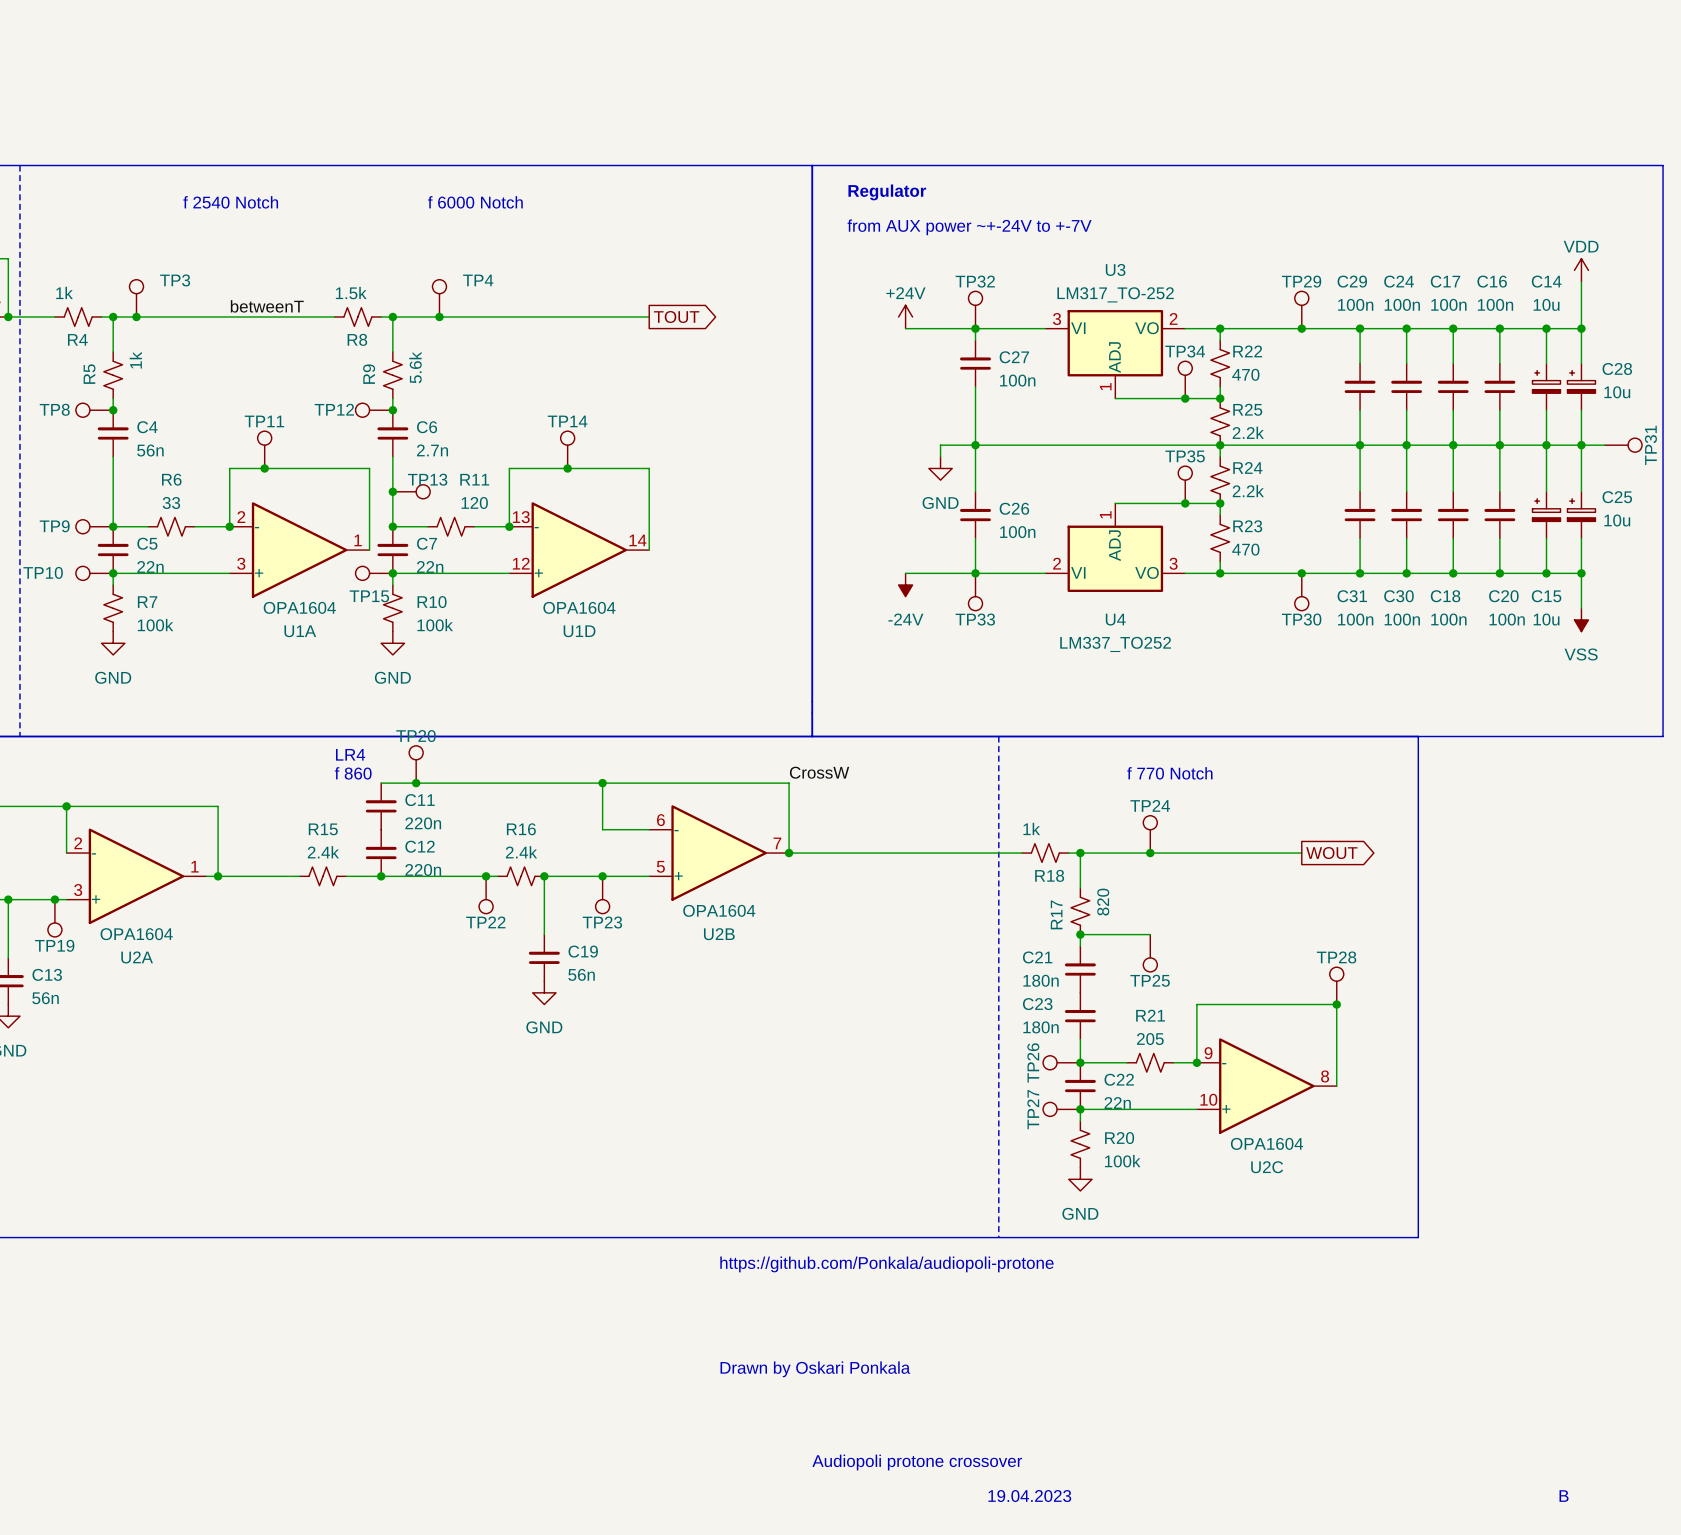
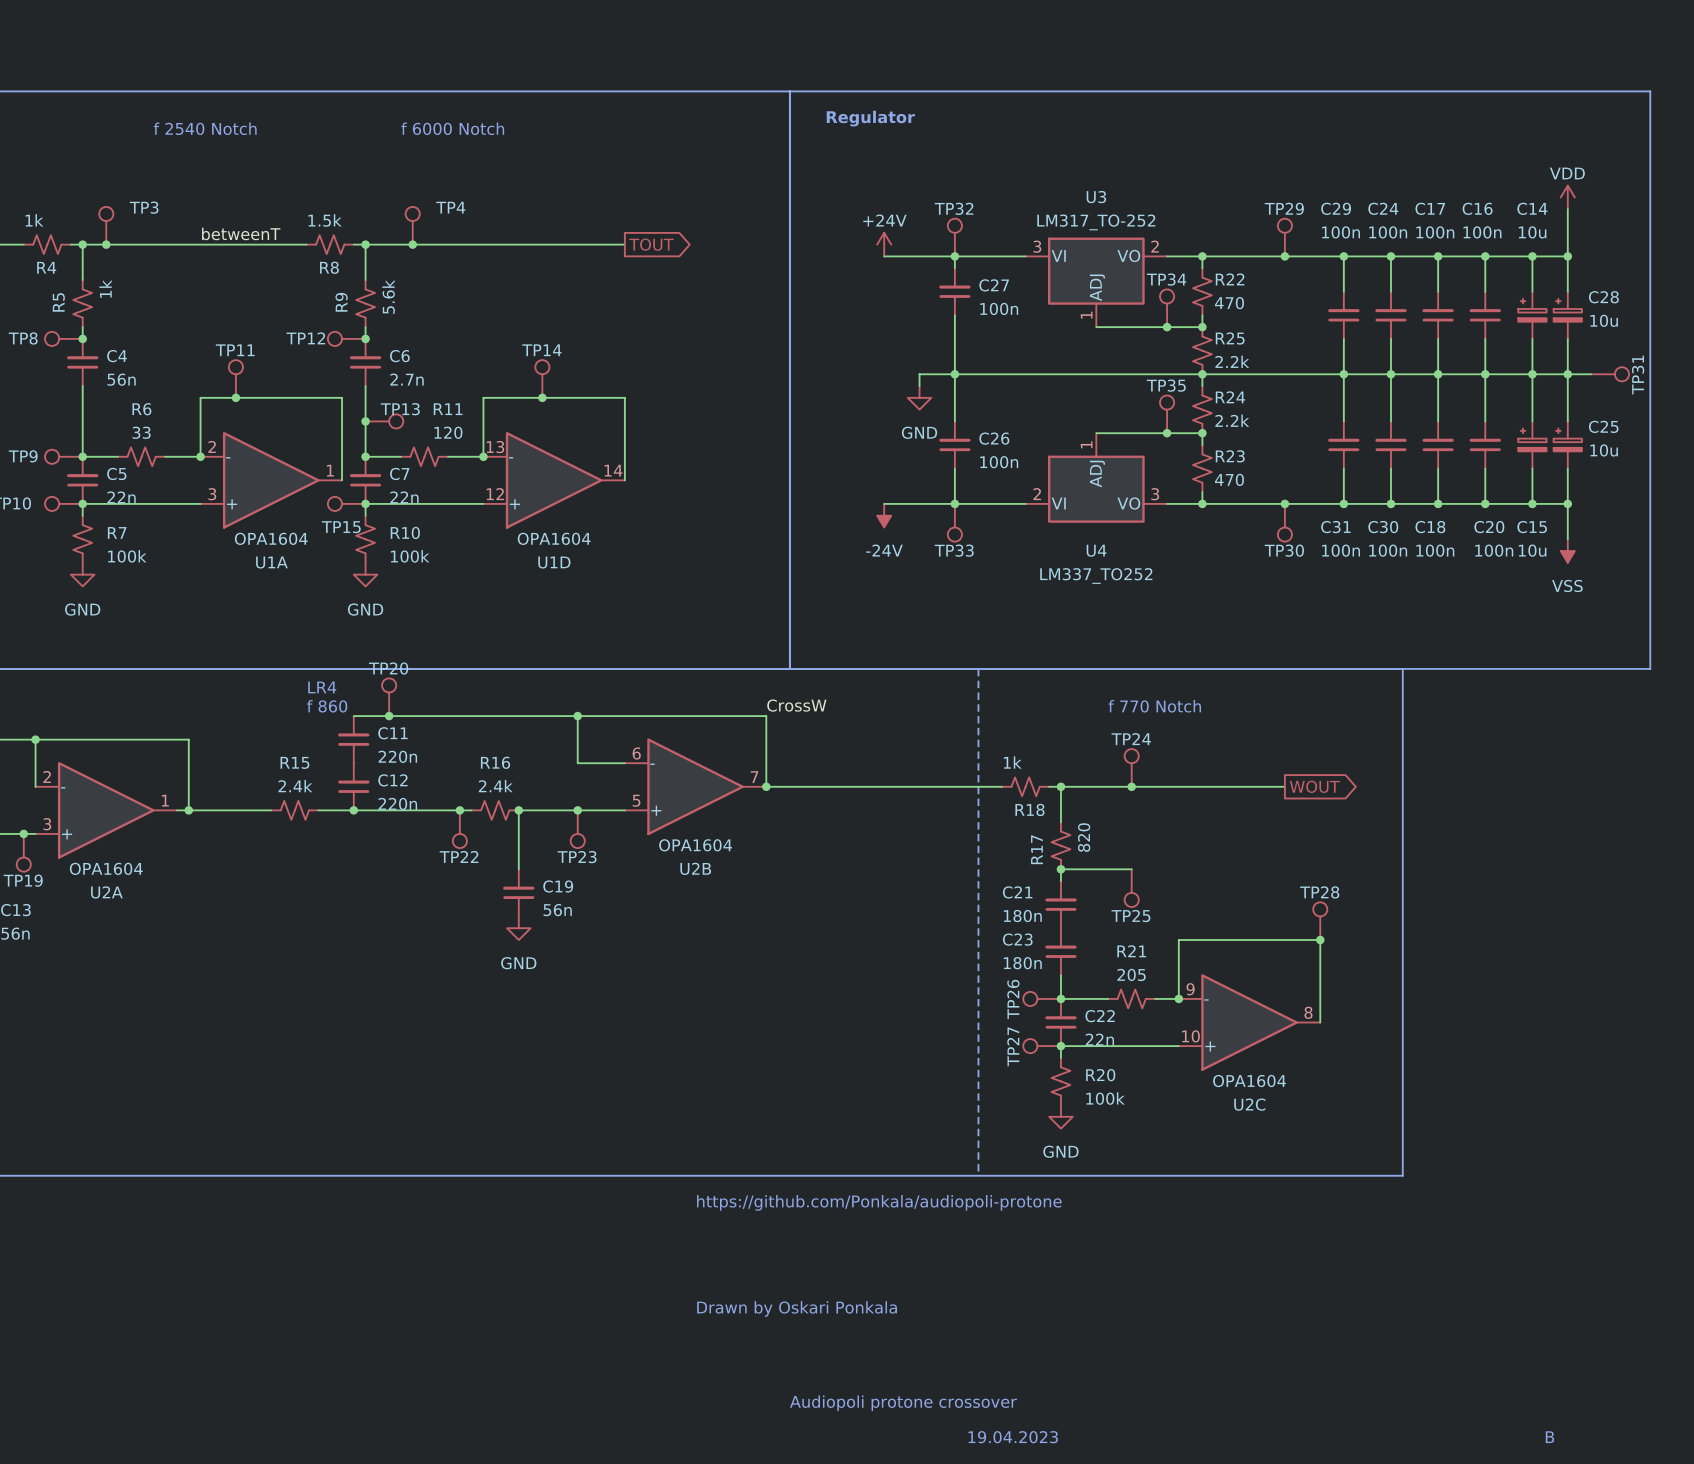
text: from AUX power ~+-24V to +-7V (969, 227) -> none

